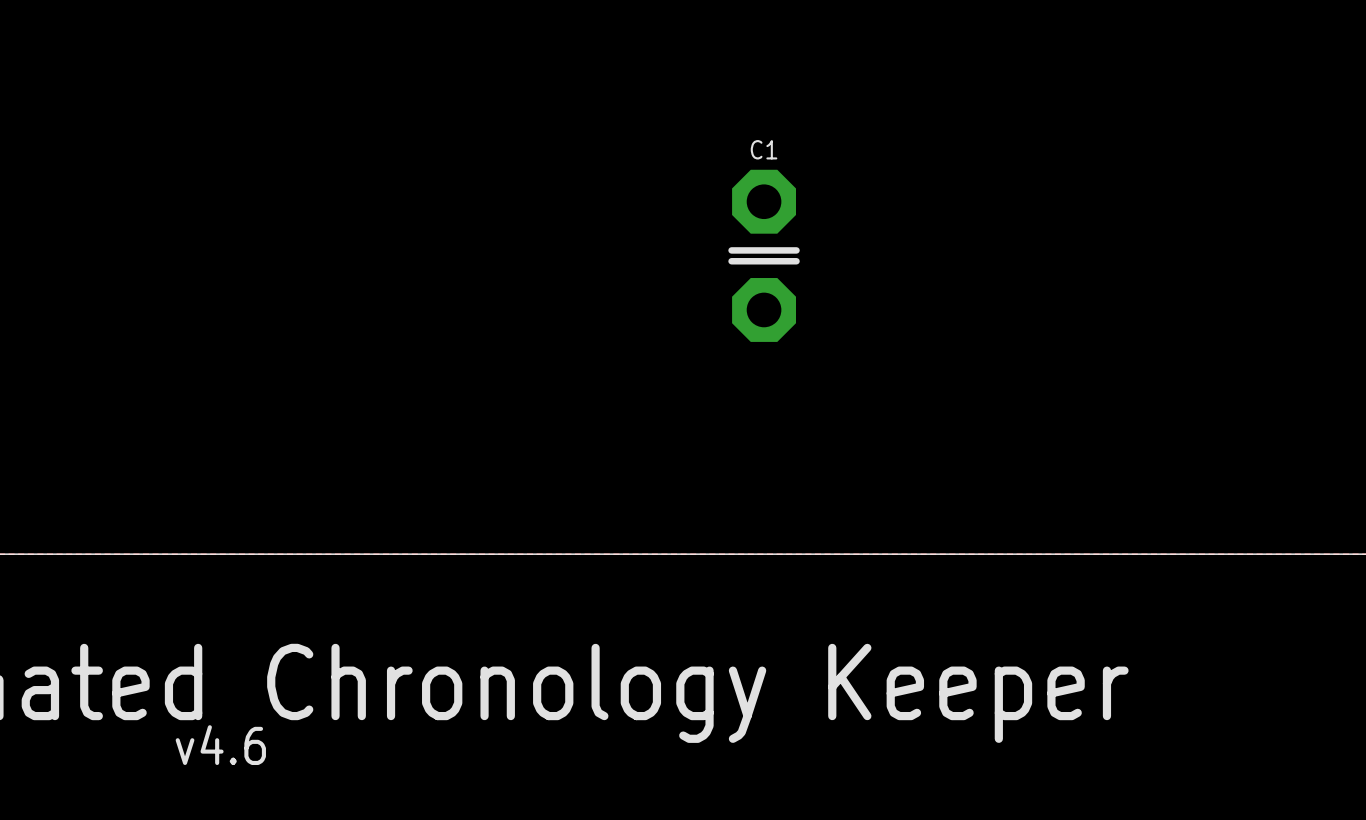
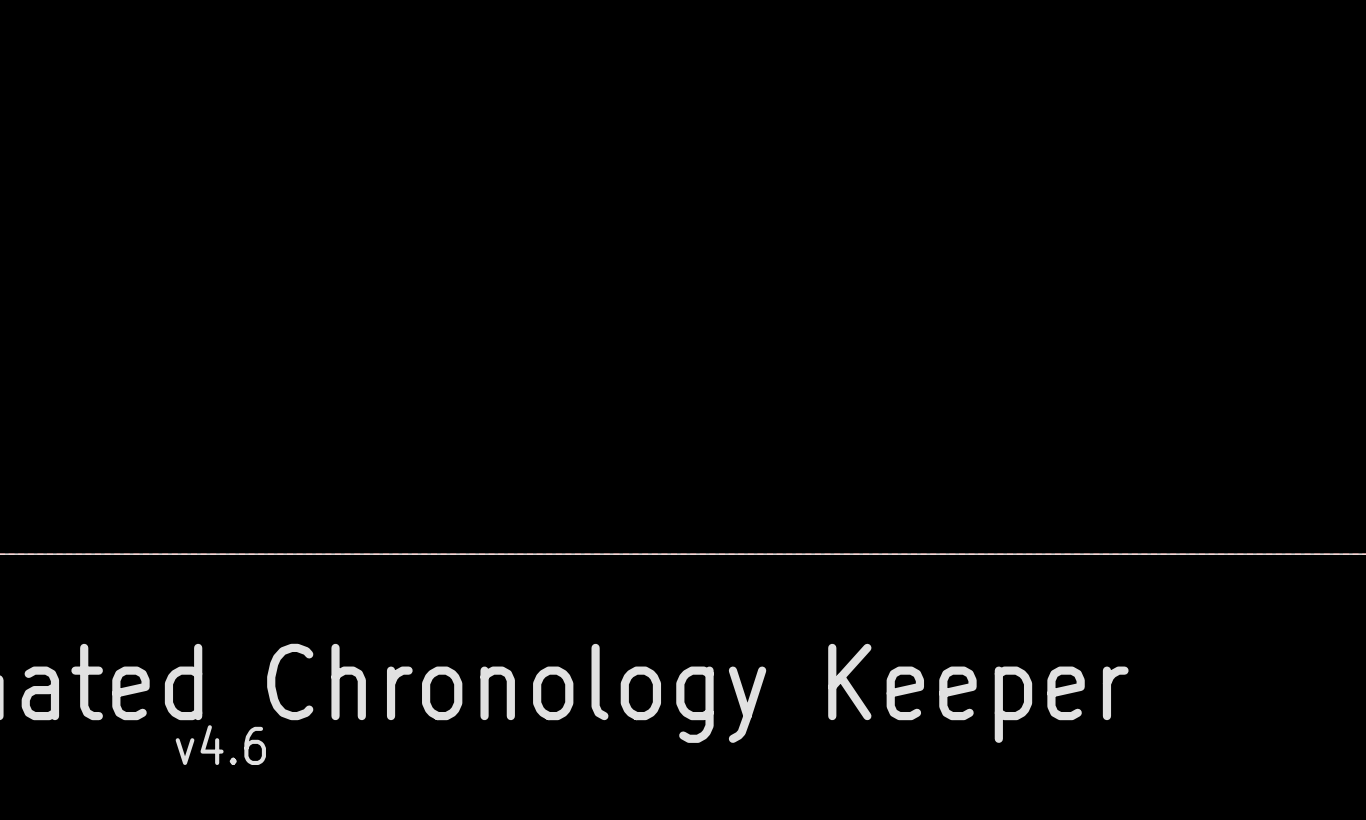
C1: (764, 255) -> none

